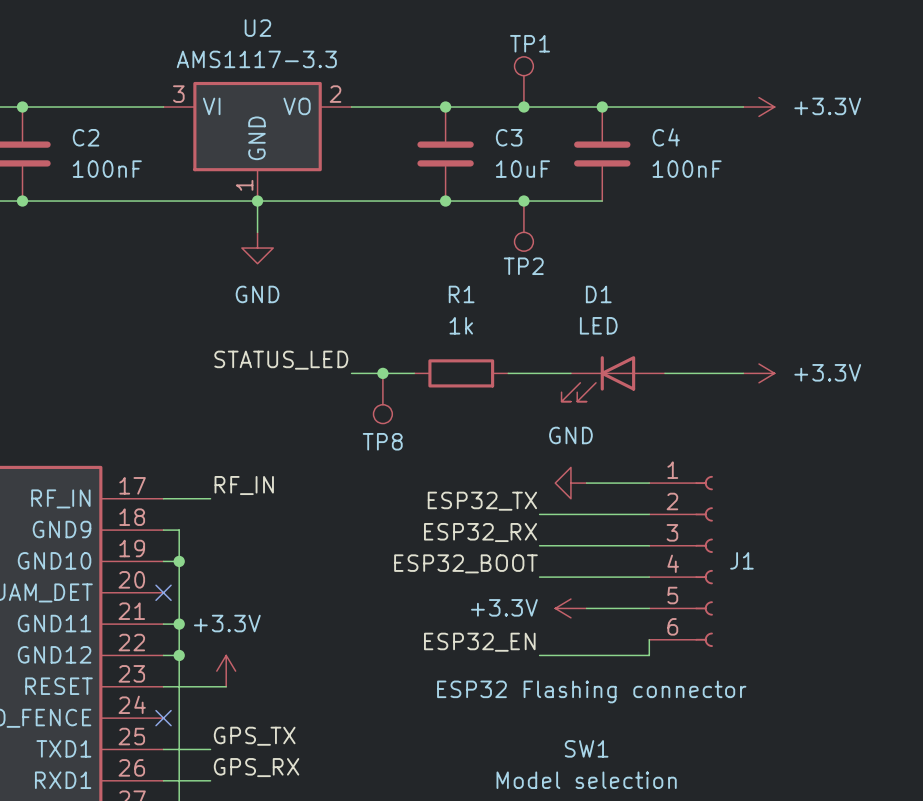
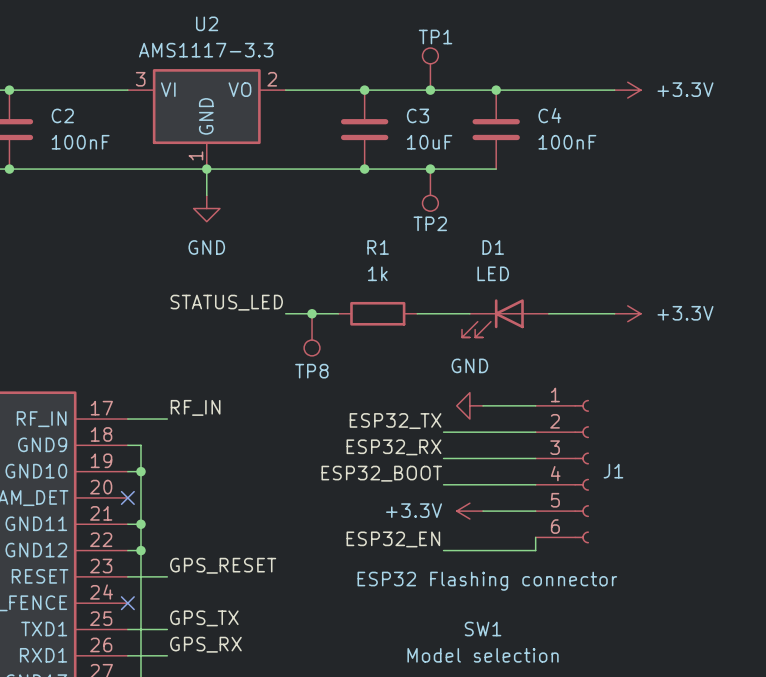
power symbol: +3.3V (226, 671) -> none
label: none -> GPS_RESET (223, 565)
wire: (210, 686) (226, 686) -> none

